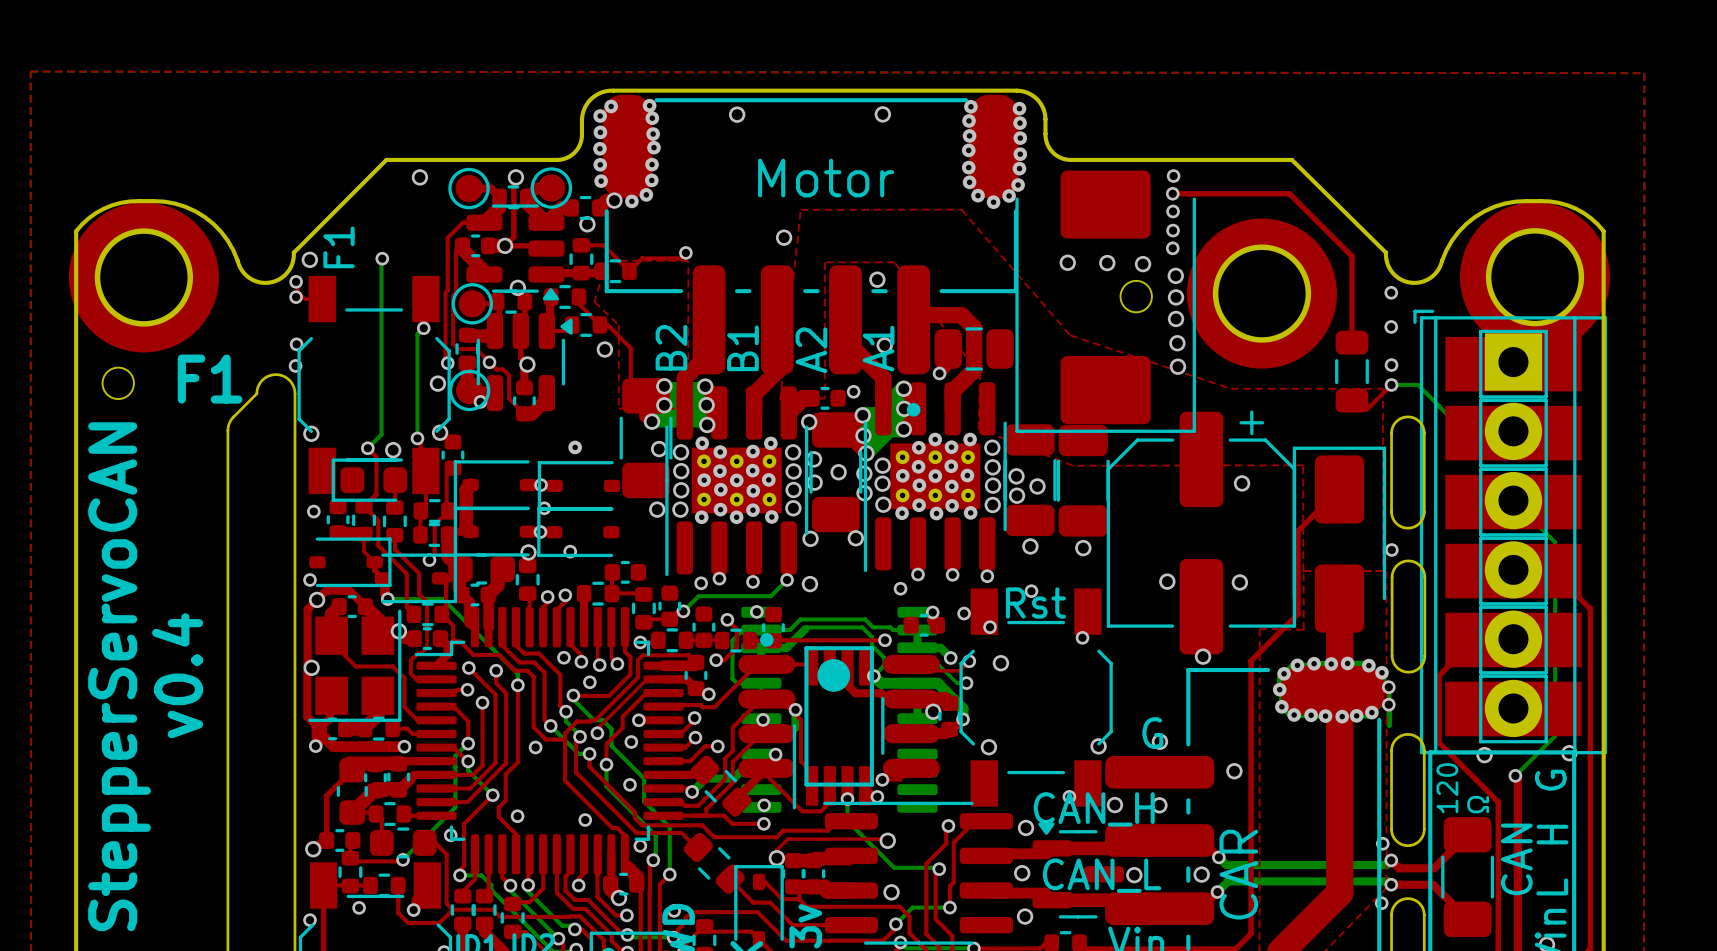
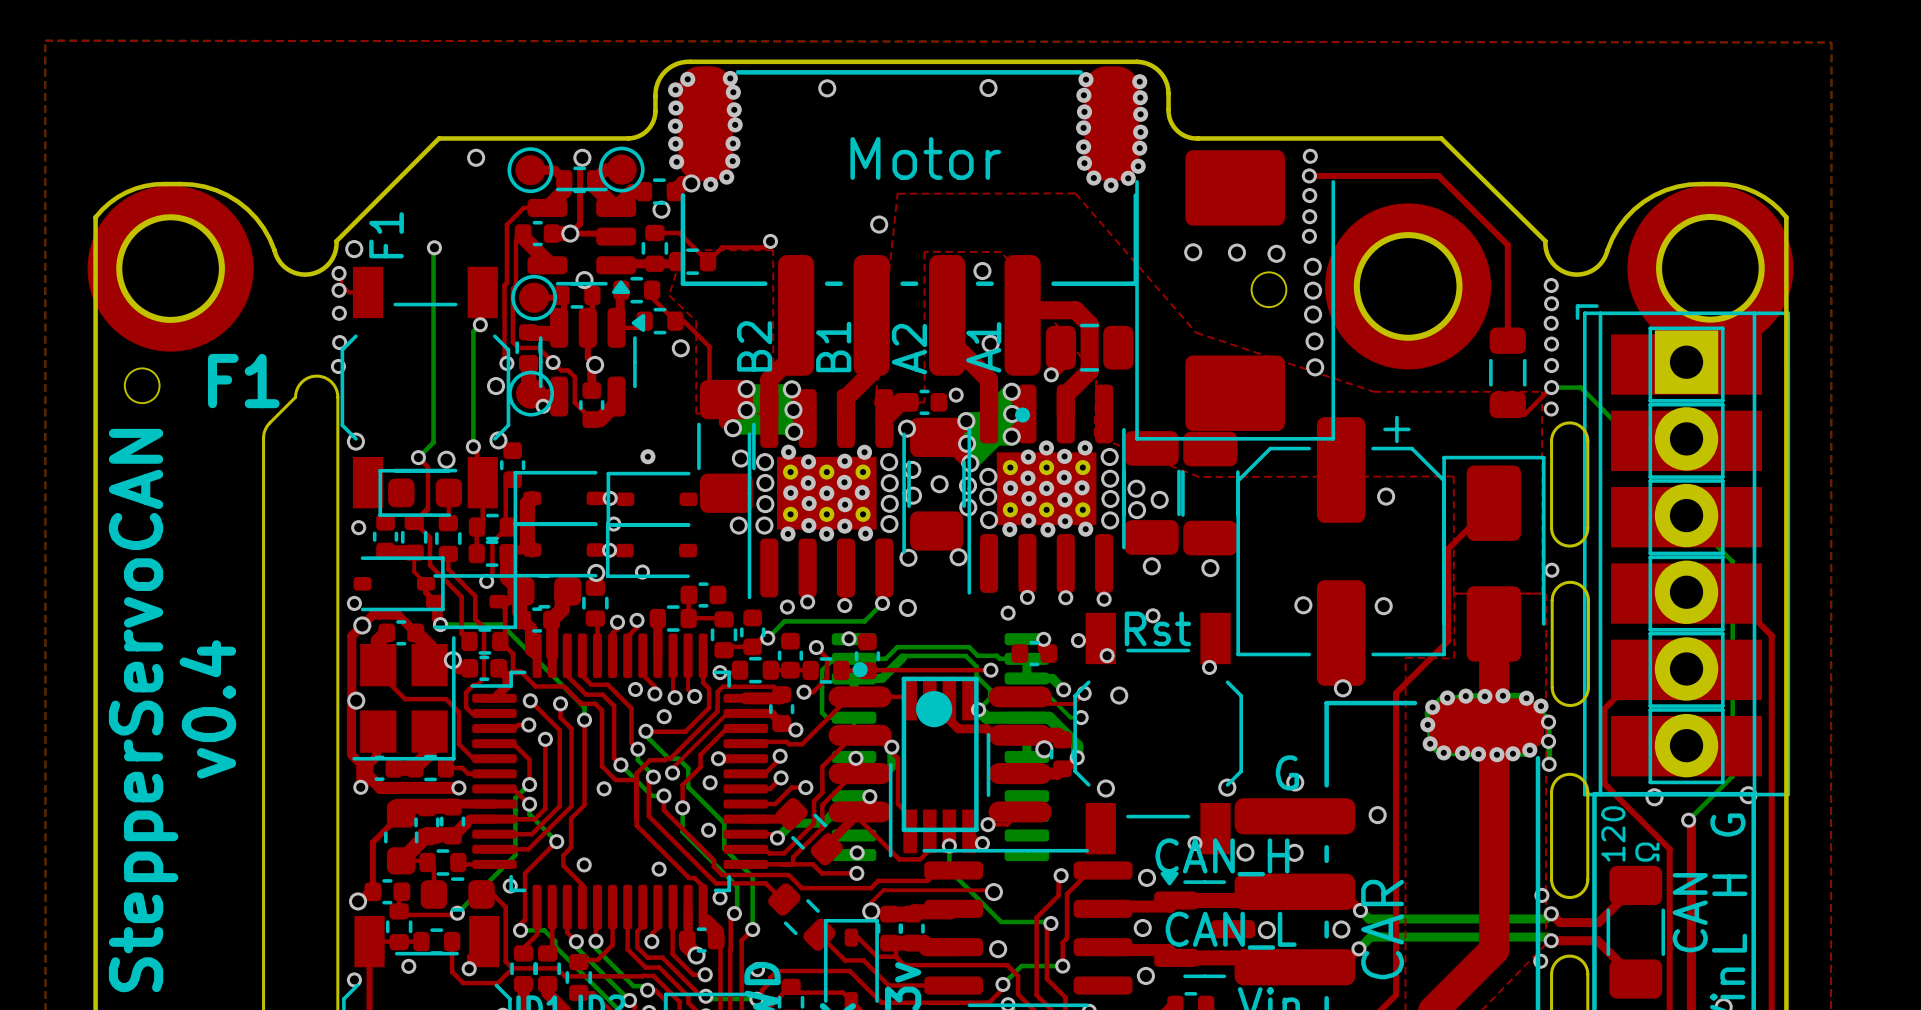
via: none -> (1551, 303)
via: none -> (339, 313)
via: none -> (1551, 344)
via: none -> (1551, 409)
via: none -> (1549, 764)

